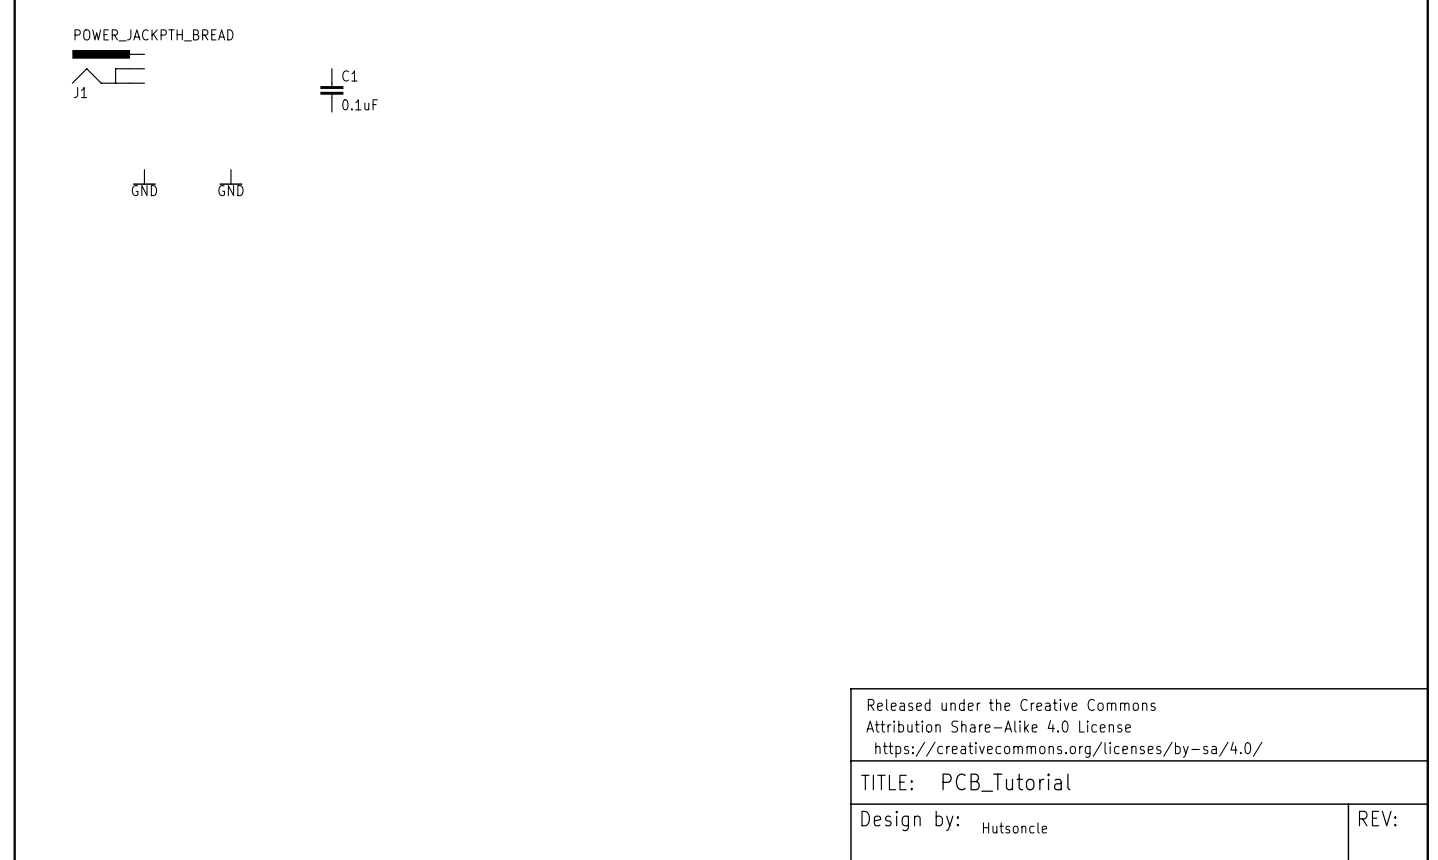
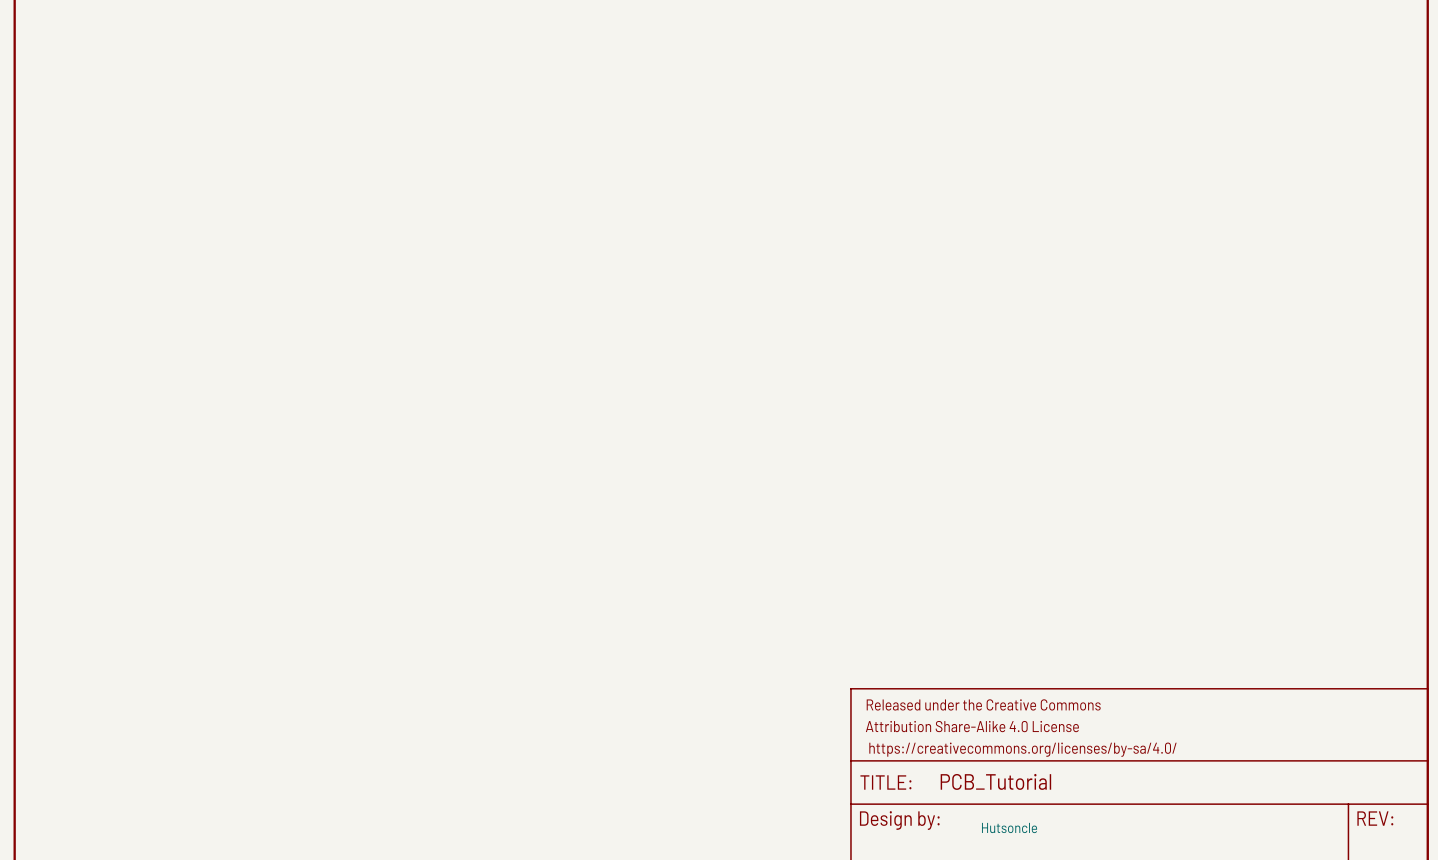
J1: POWER_JACKPTH_BREAD (108, 66) -> none
C1: 0.1uF (331, 90) -> none
power symbol: GND (144, 177) -> none
power symbol: GND (230, 177) -> none

